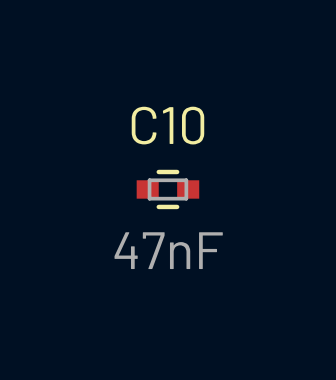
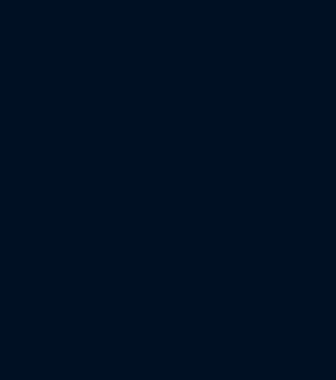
C10: 47nF (167, 189) -> none

